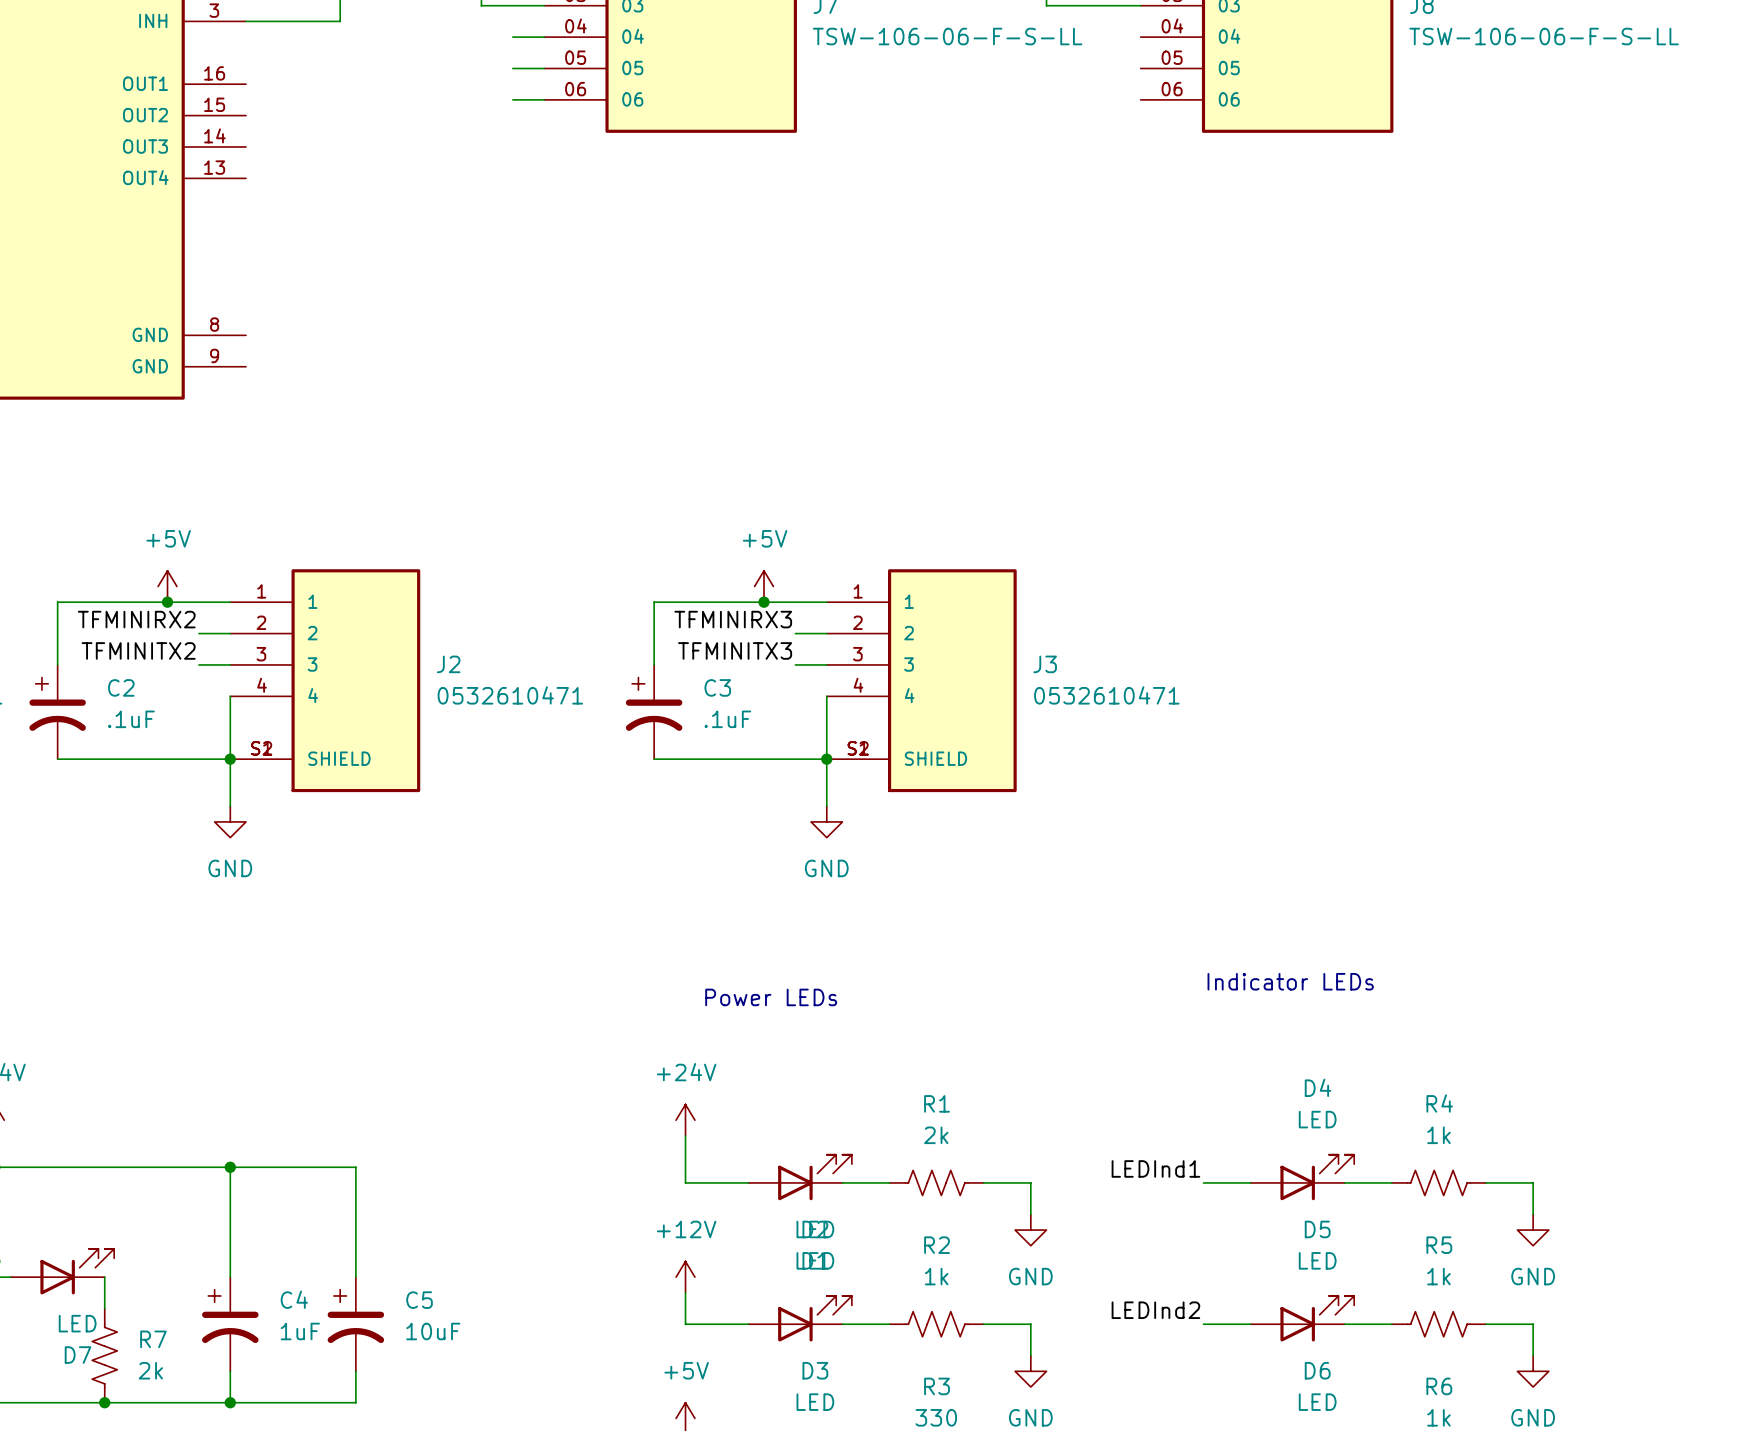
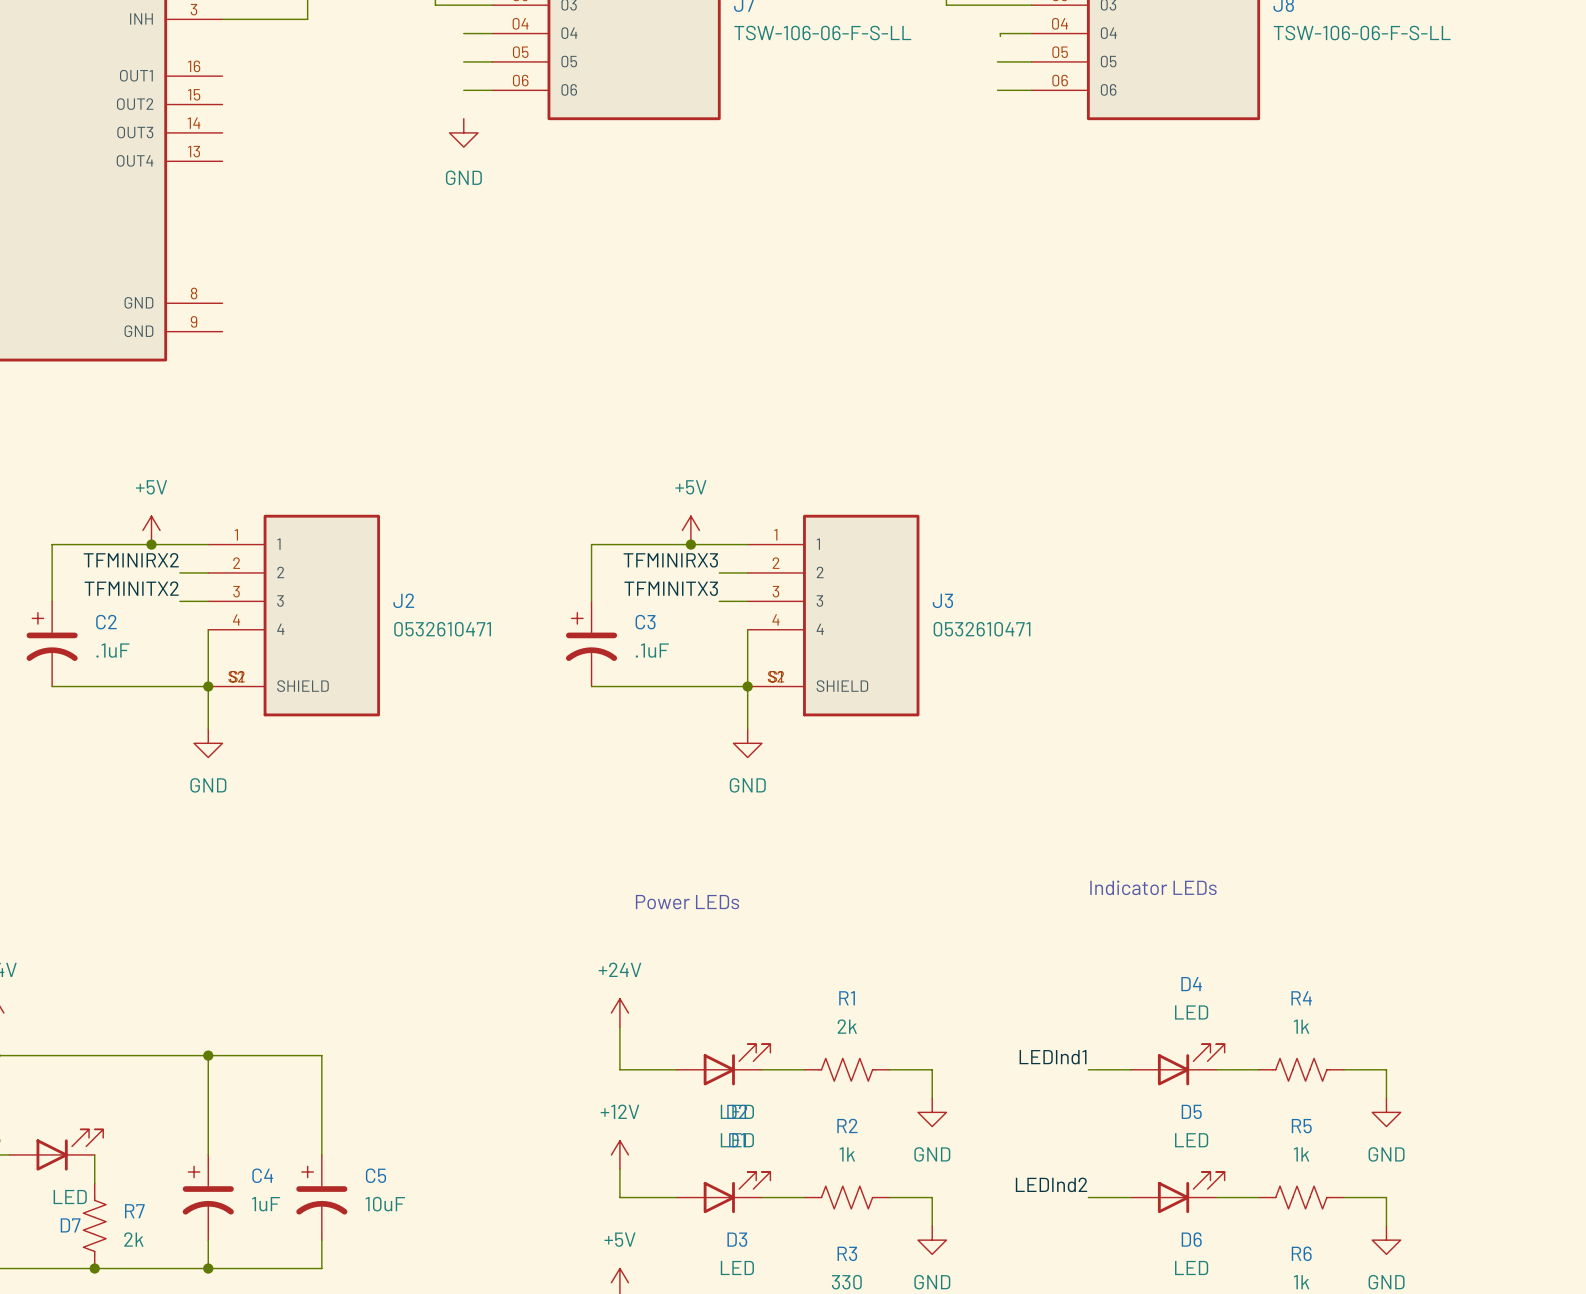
wire: none -> (1031, 33) (1000, 33) (1000, 36)
wire: none -> (997, 61) (1031, 61)
wire: none -> (997, 90) (1031, 90)
power symbol: none -> GND (463, 132)

